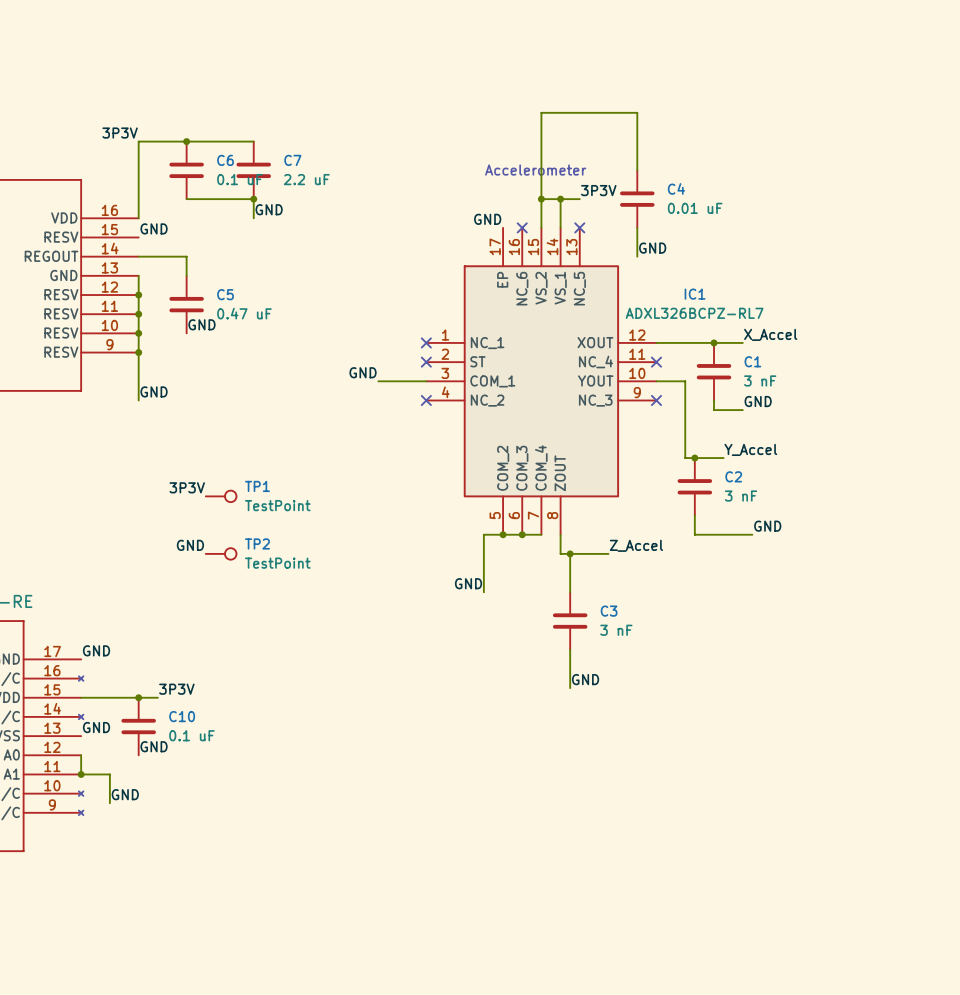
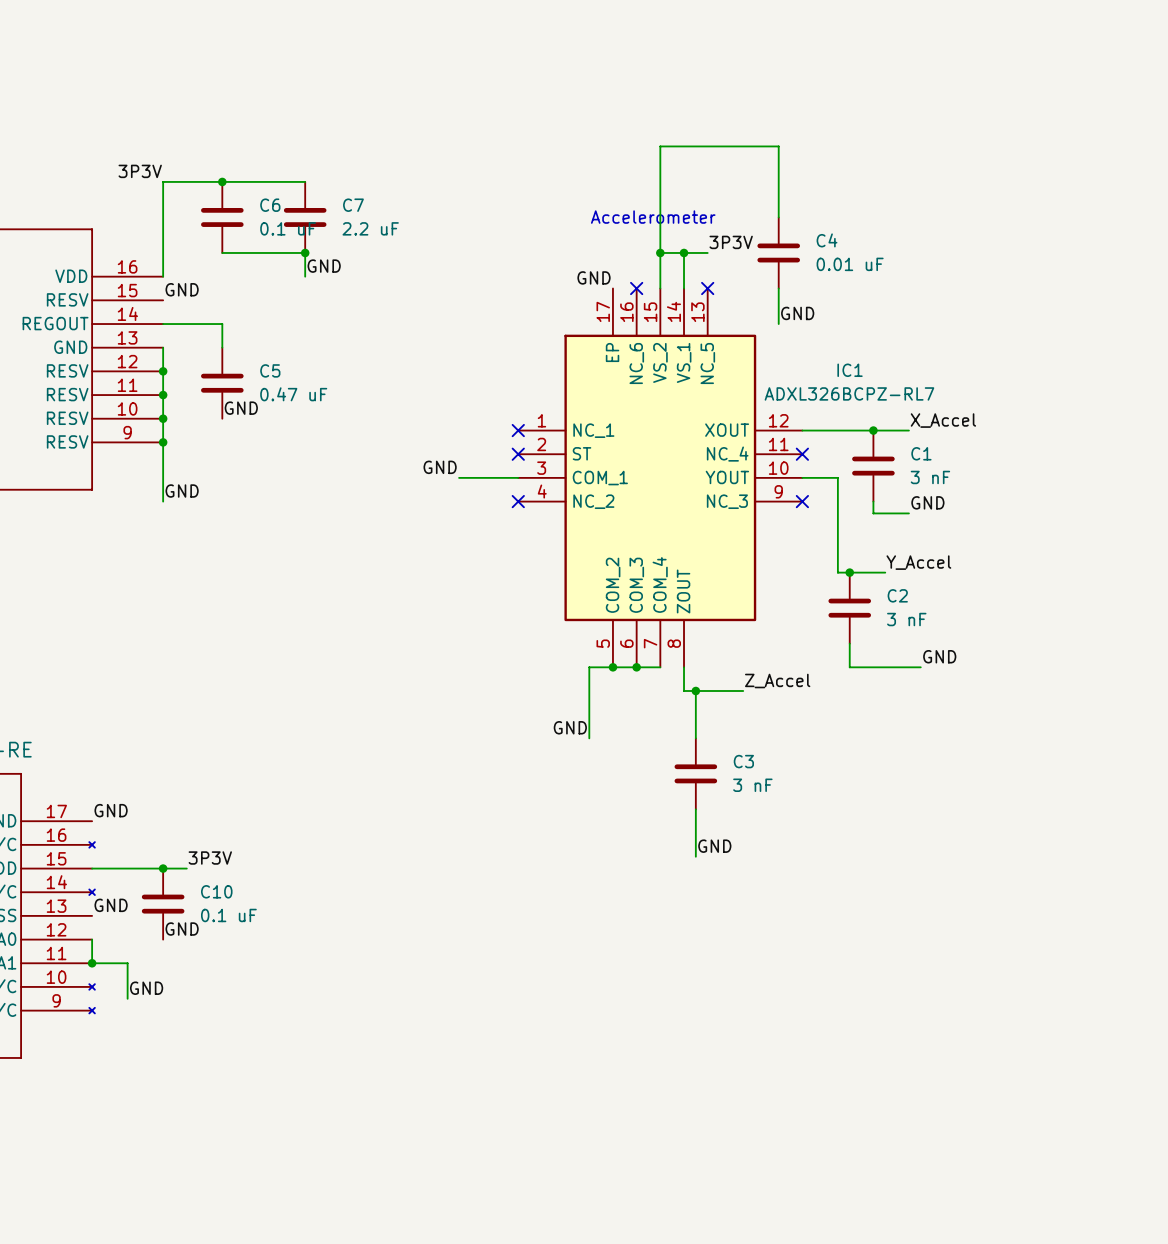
label: 3P3V (187, 487) -> none
TP1: TestPoint (221, 496) -> none
label: GND (190, 545) -> none
TP2: TestPoint (221, 553) -> none

